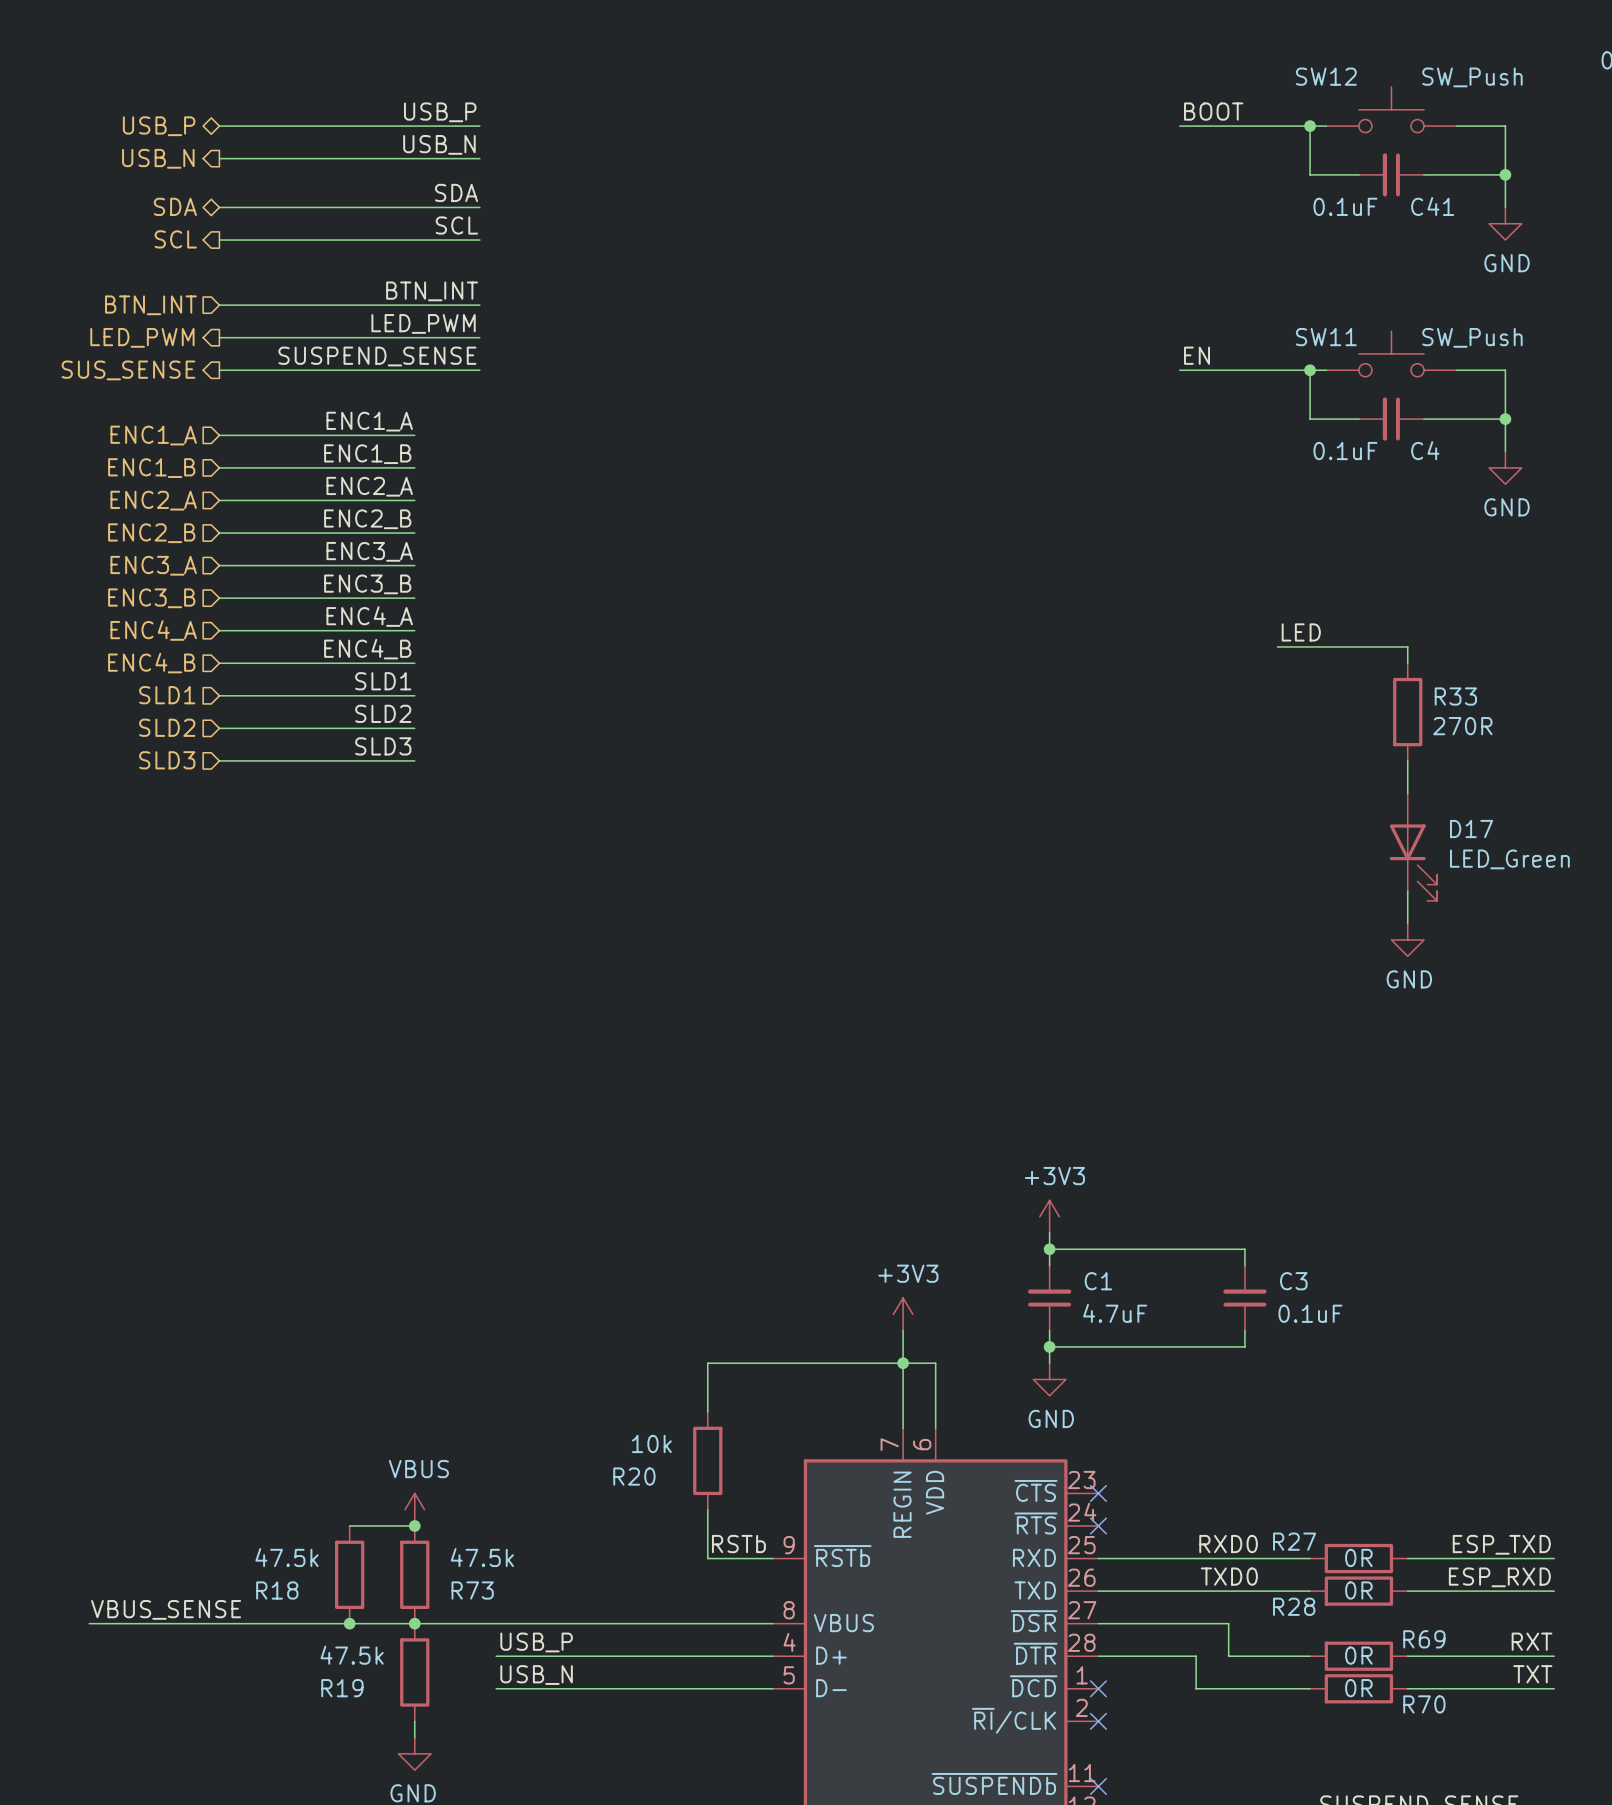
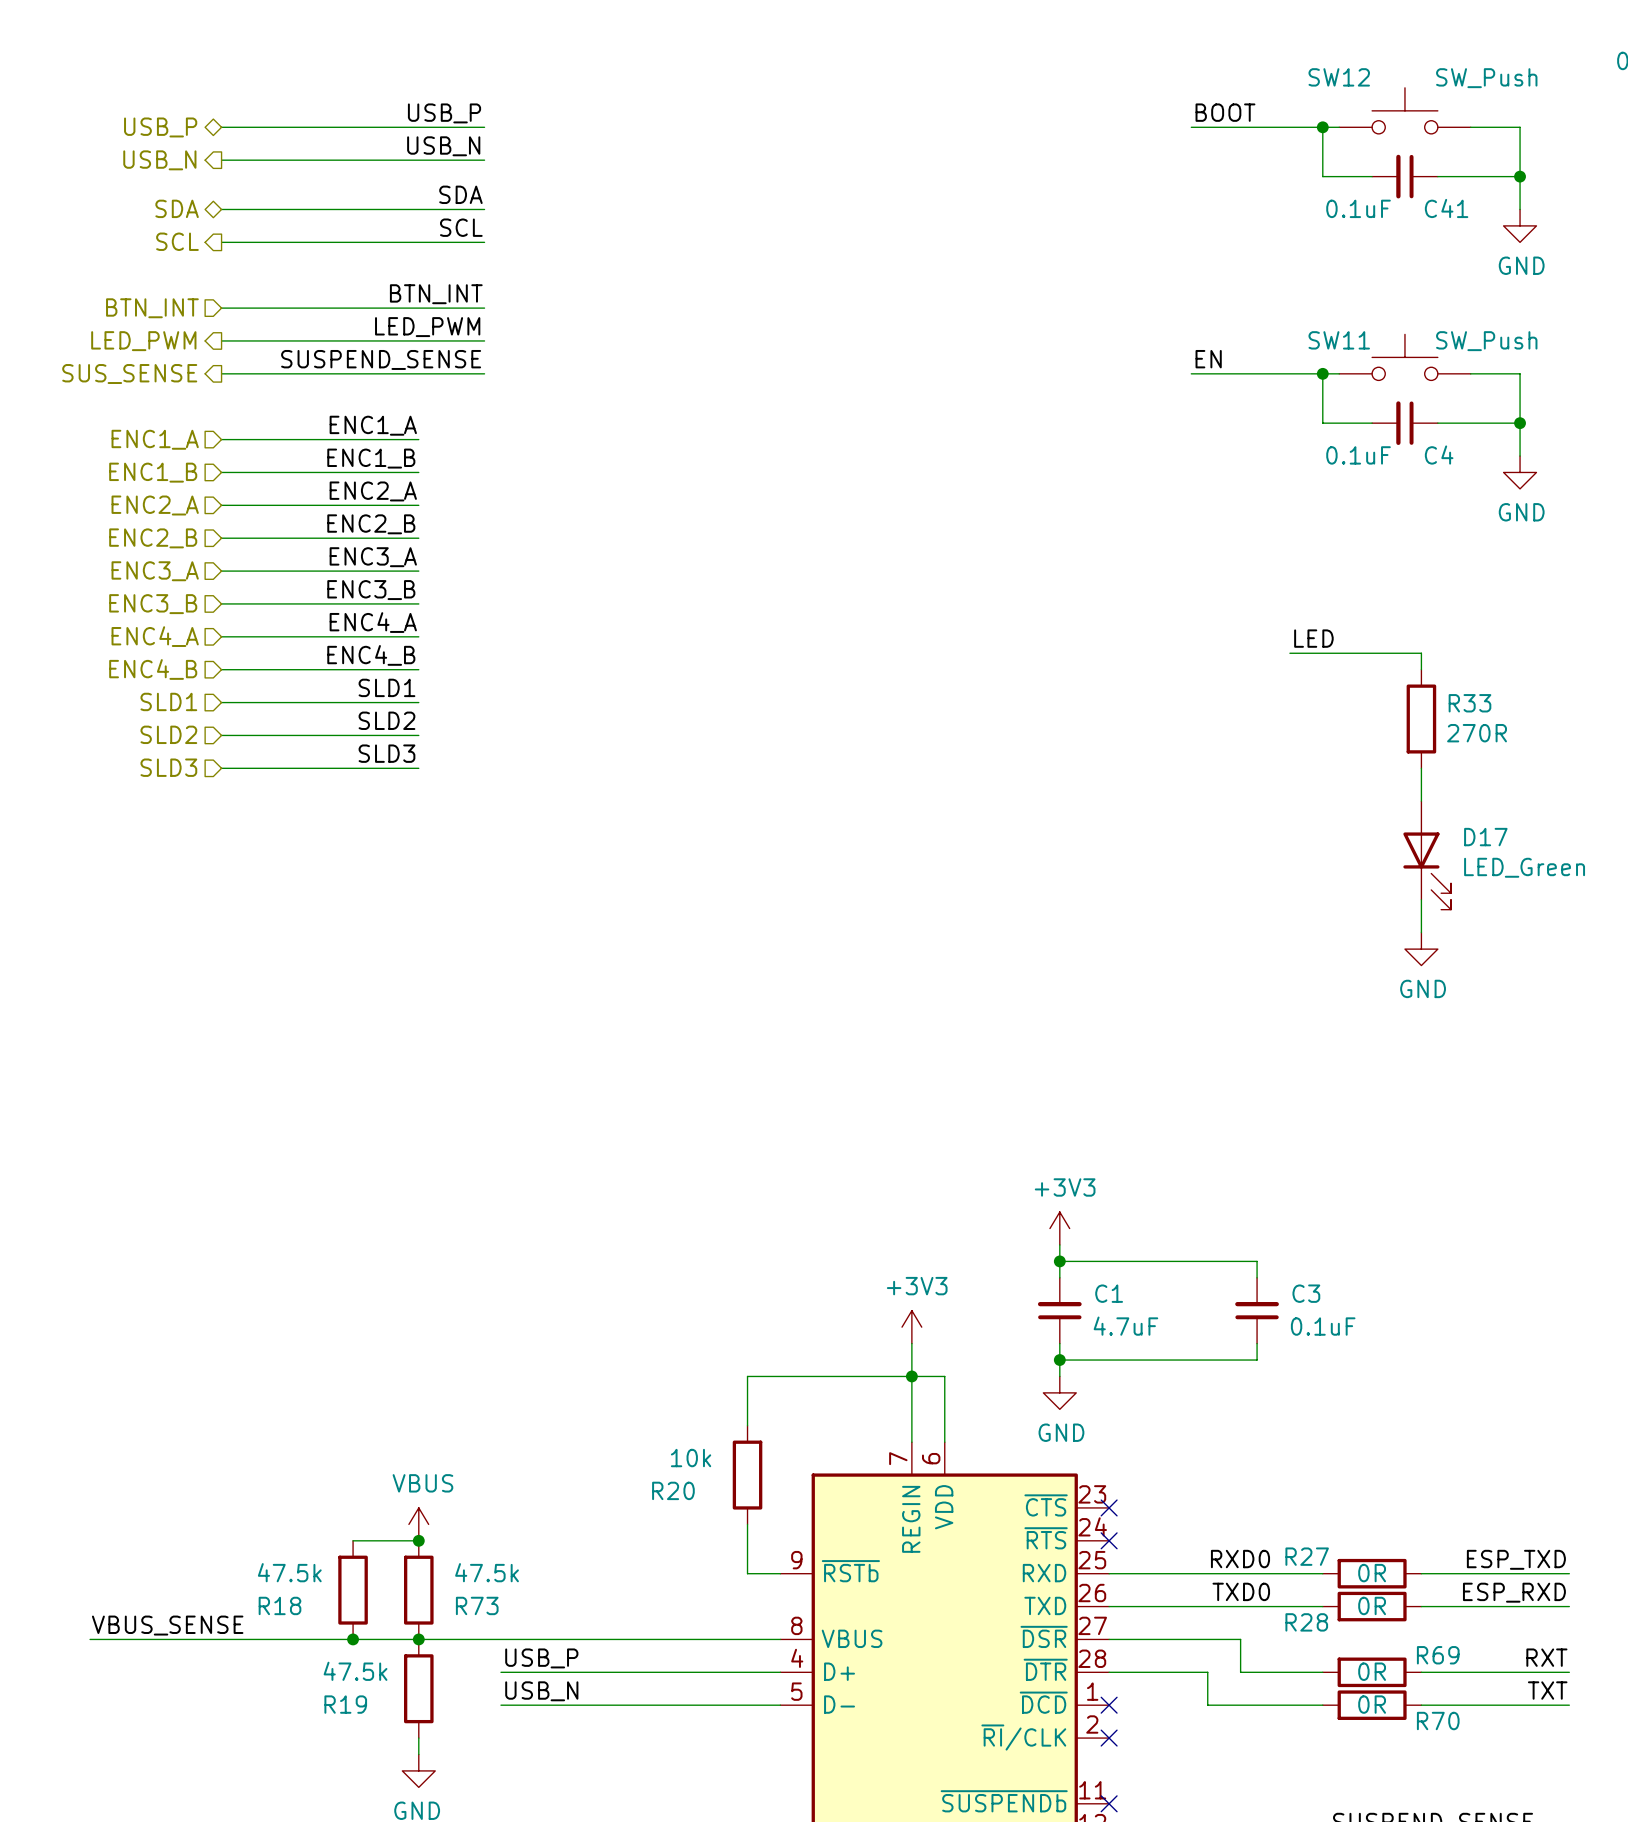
wire: (740, 1363) (707, 1363) (707, 1412) -> (747, 1376) (747, 1425)
R20 position: (707, 1460) -> (747, 1475)
wire: (707, 1509) (707, 1558) (740, 1558) -> (747, 1524) (747, 1573)
label: RSTb (738, 1544) -> none

